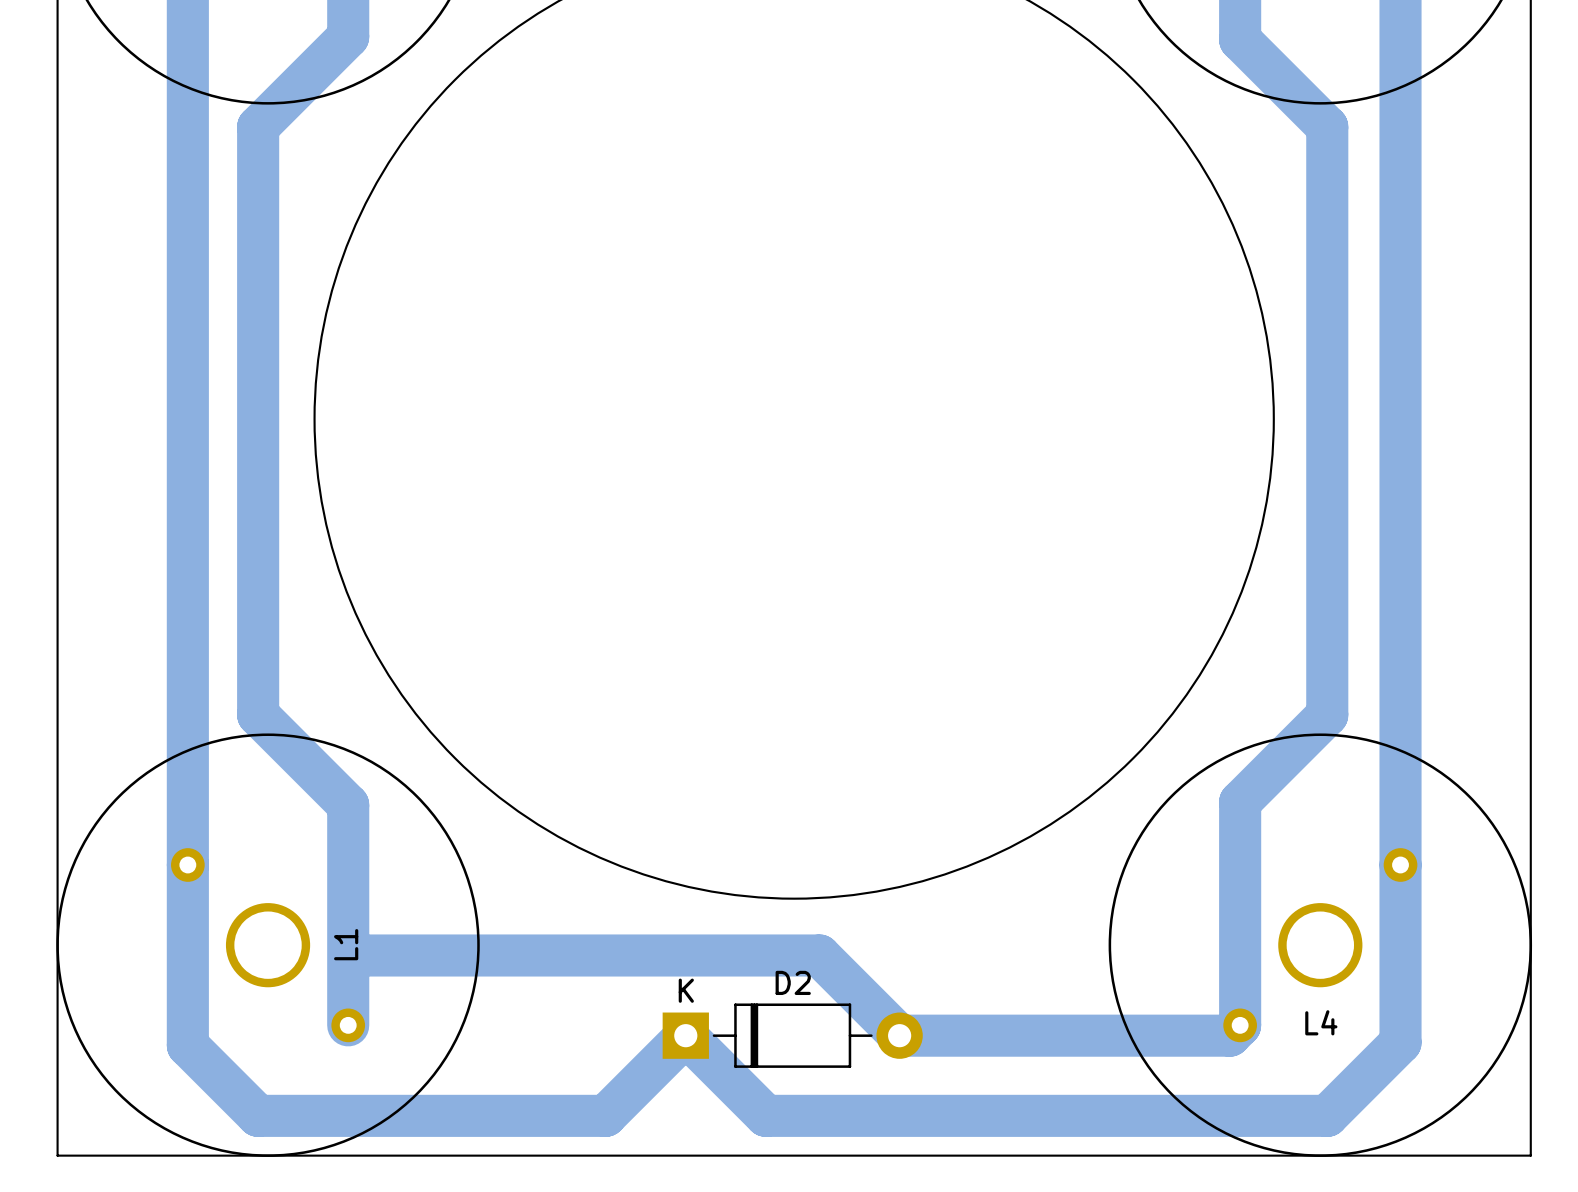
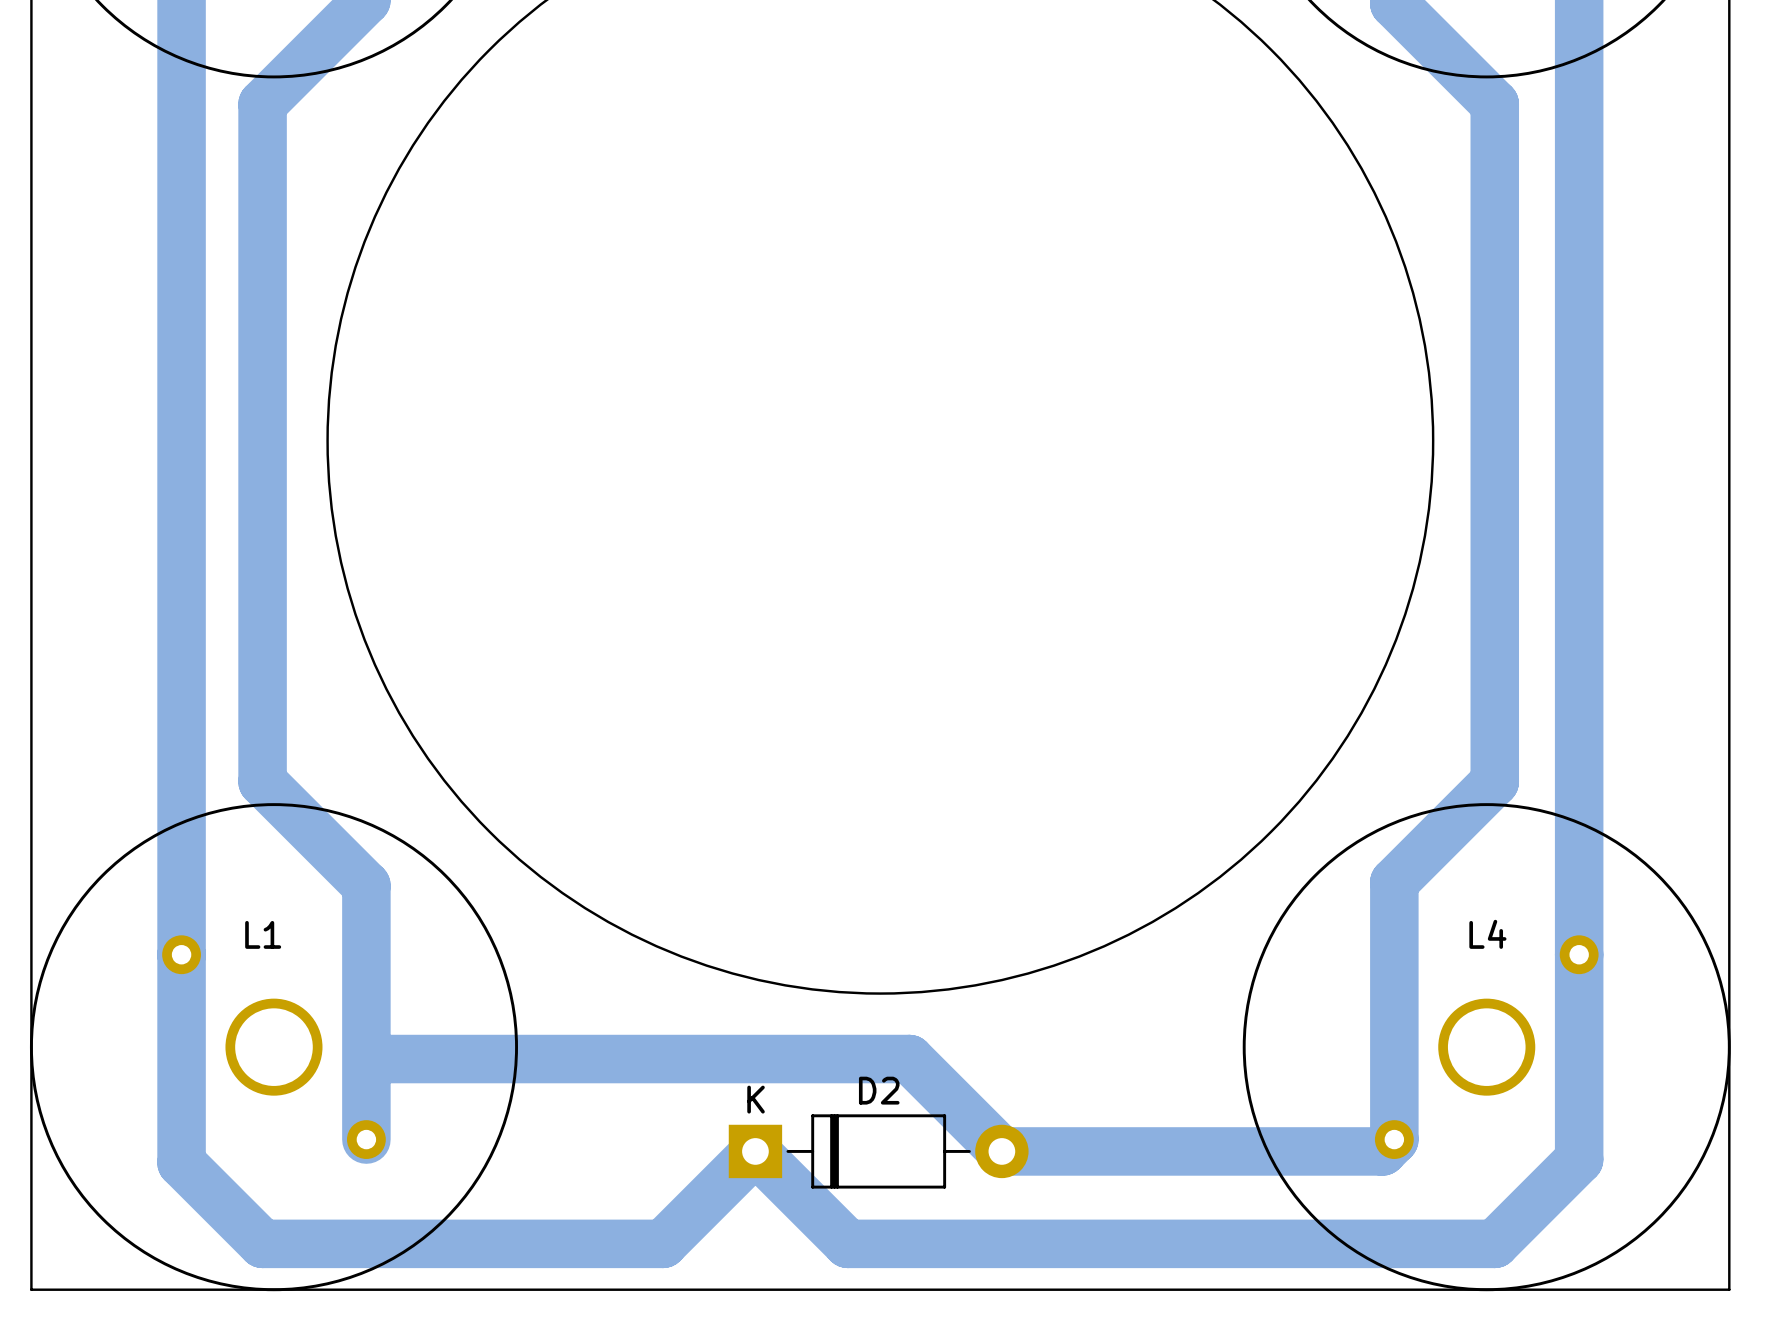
L1 name rotation: 0° (346, 944) -> 90° clockwise (263, 934)
L1 name position: L1 (346, 944) -> L1 (263, 934)
L4 name position: L4 (1321, 1022) -> L4 (1487, 934)

